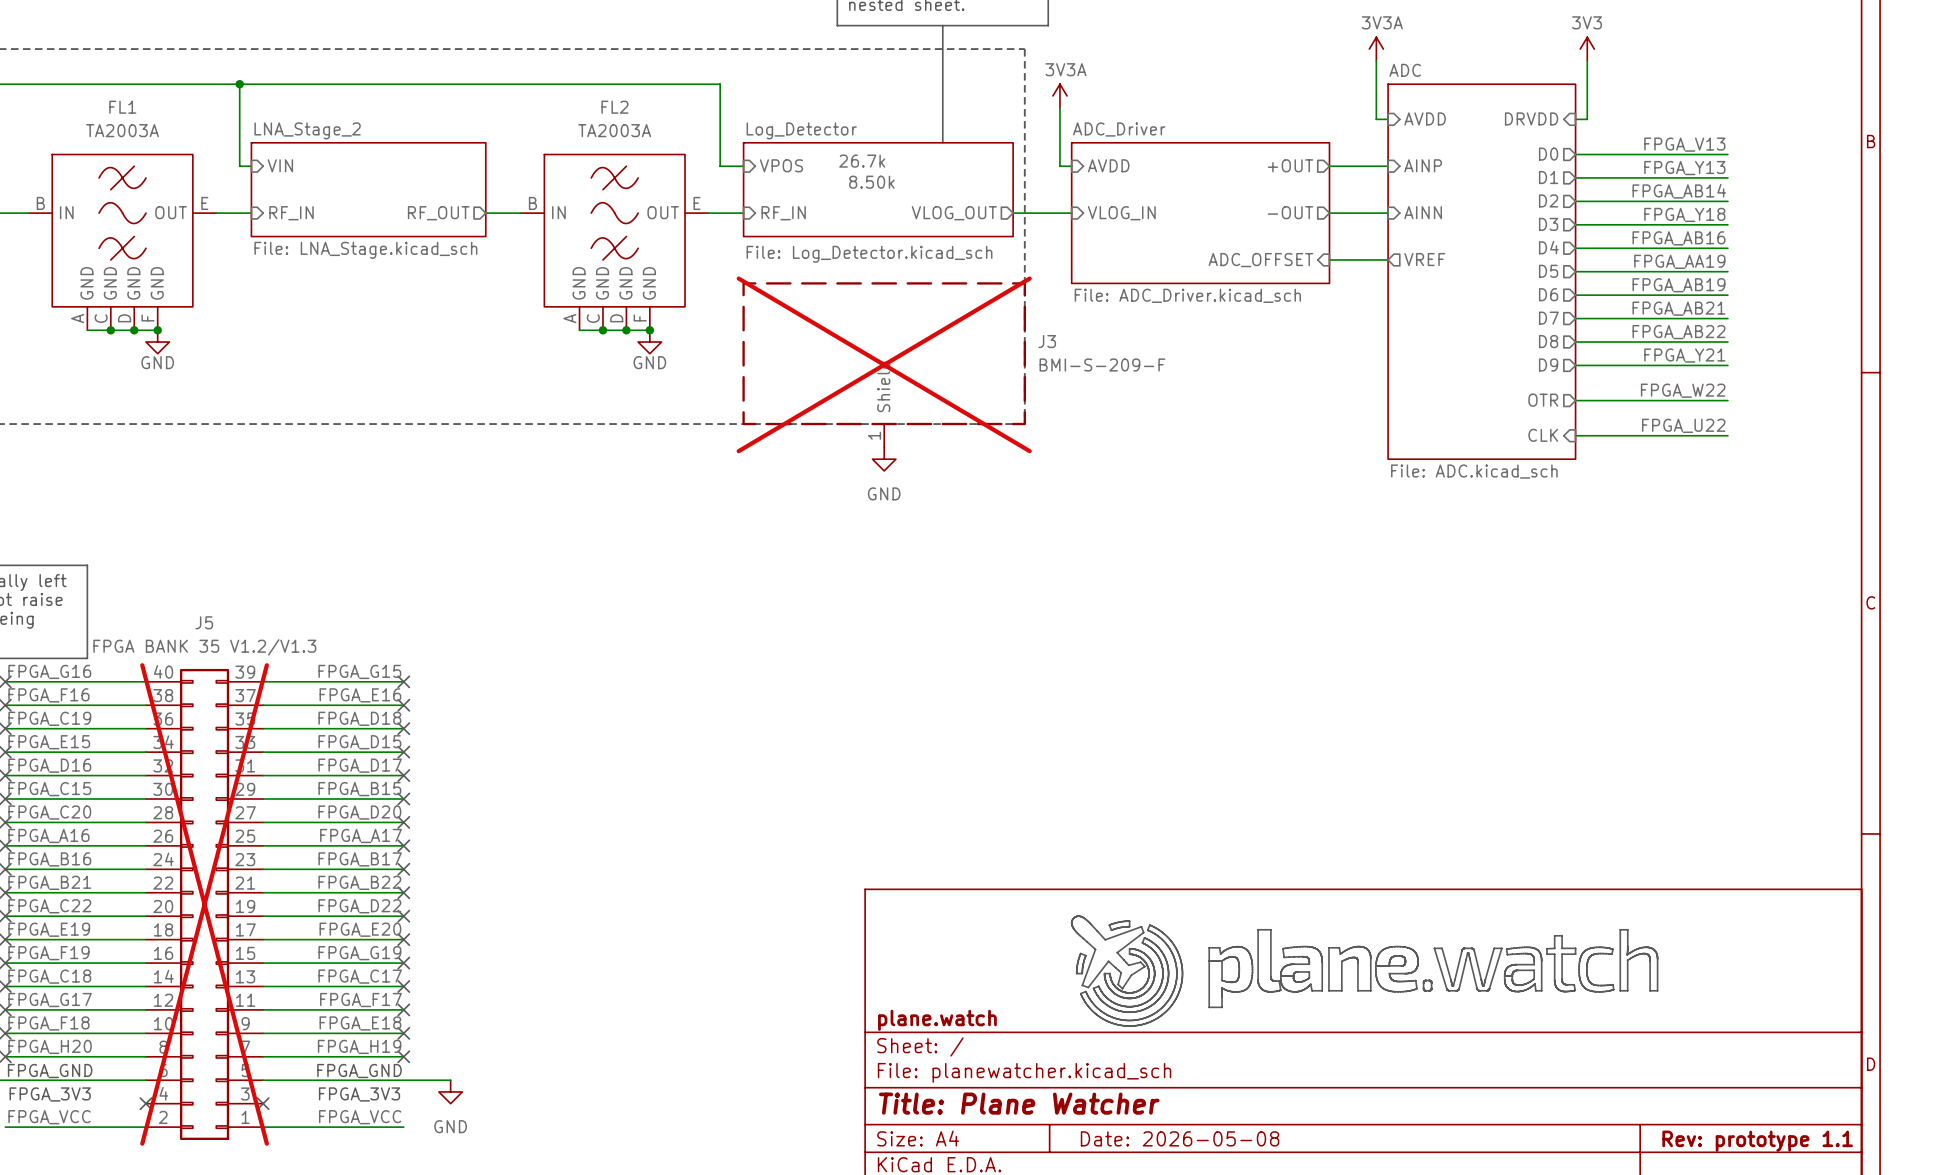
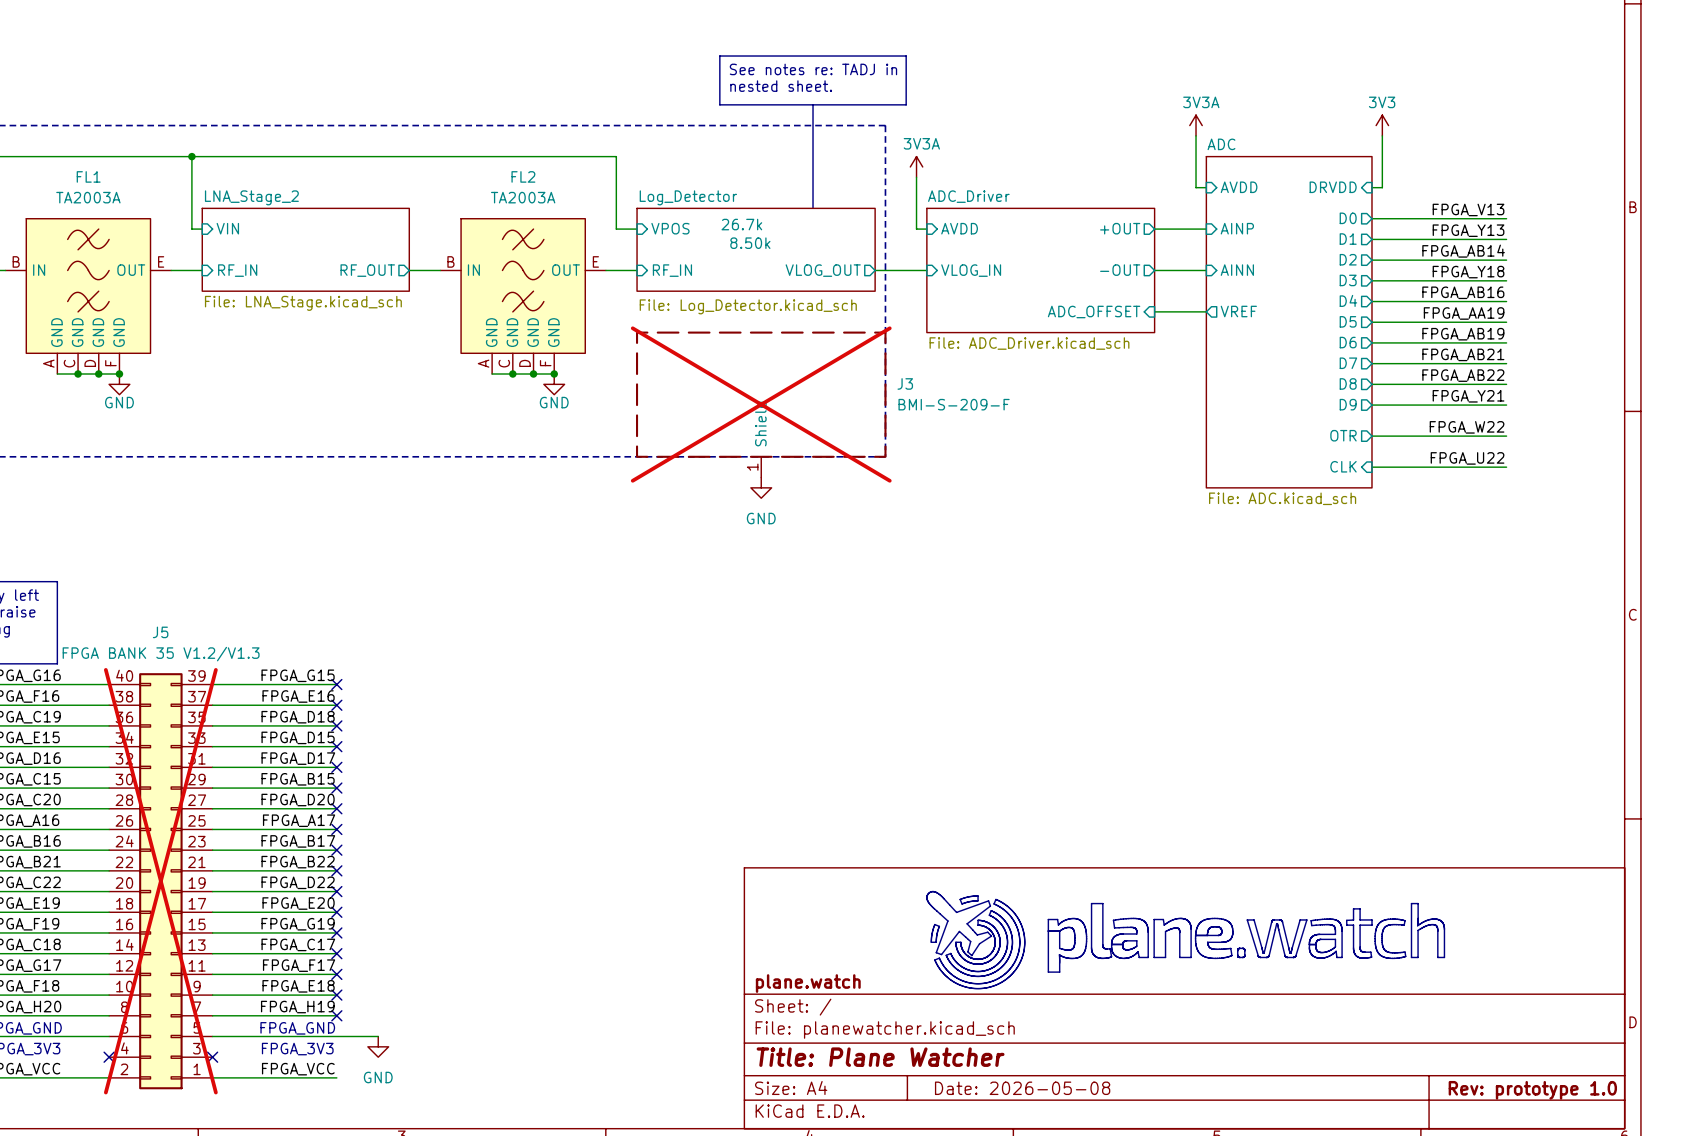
title block: Rev: prototype 1.1 (1757, 1141) -> Rev: prototype 1.0 (1532, 1090)

